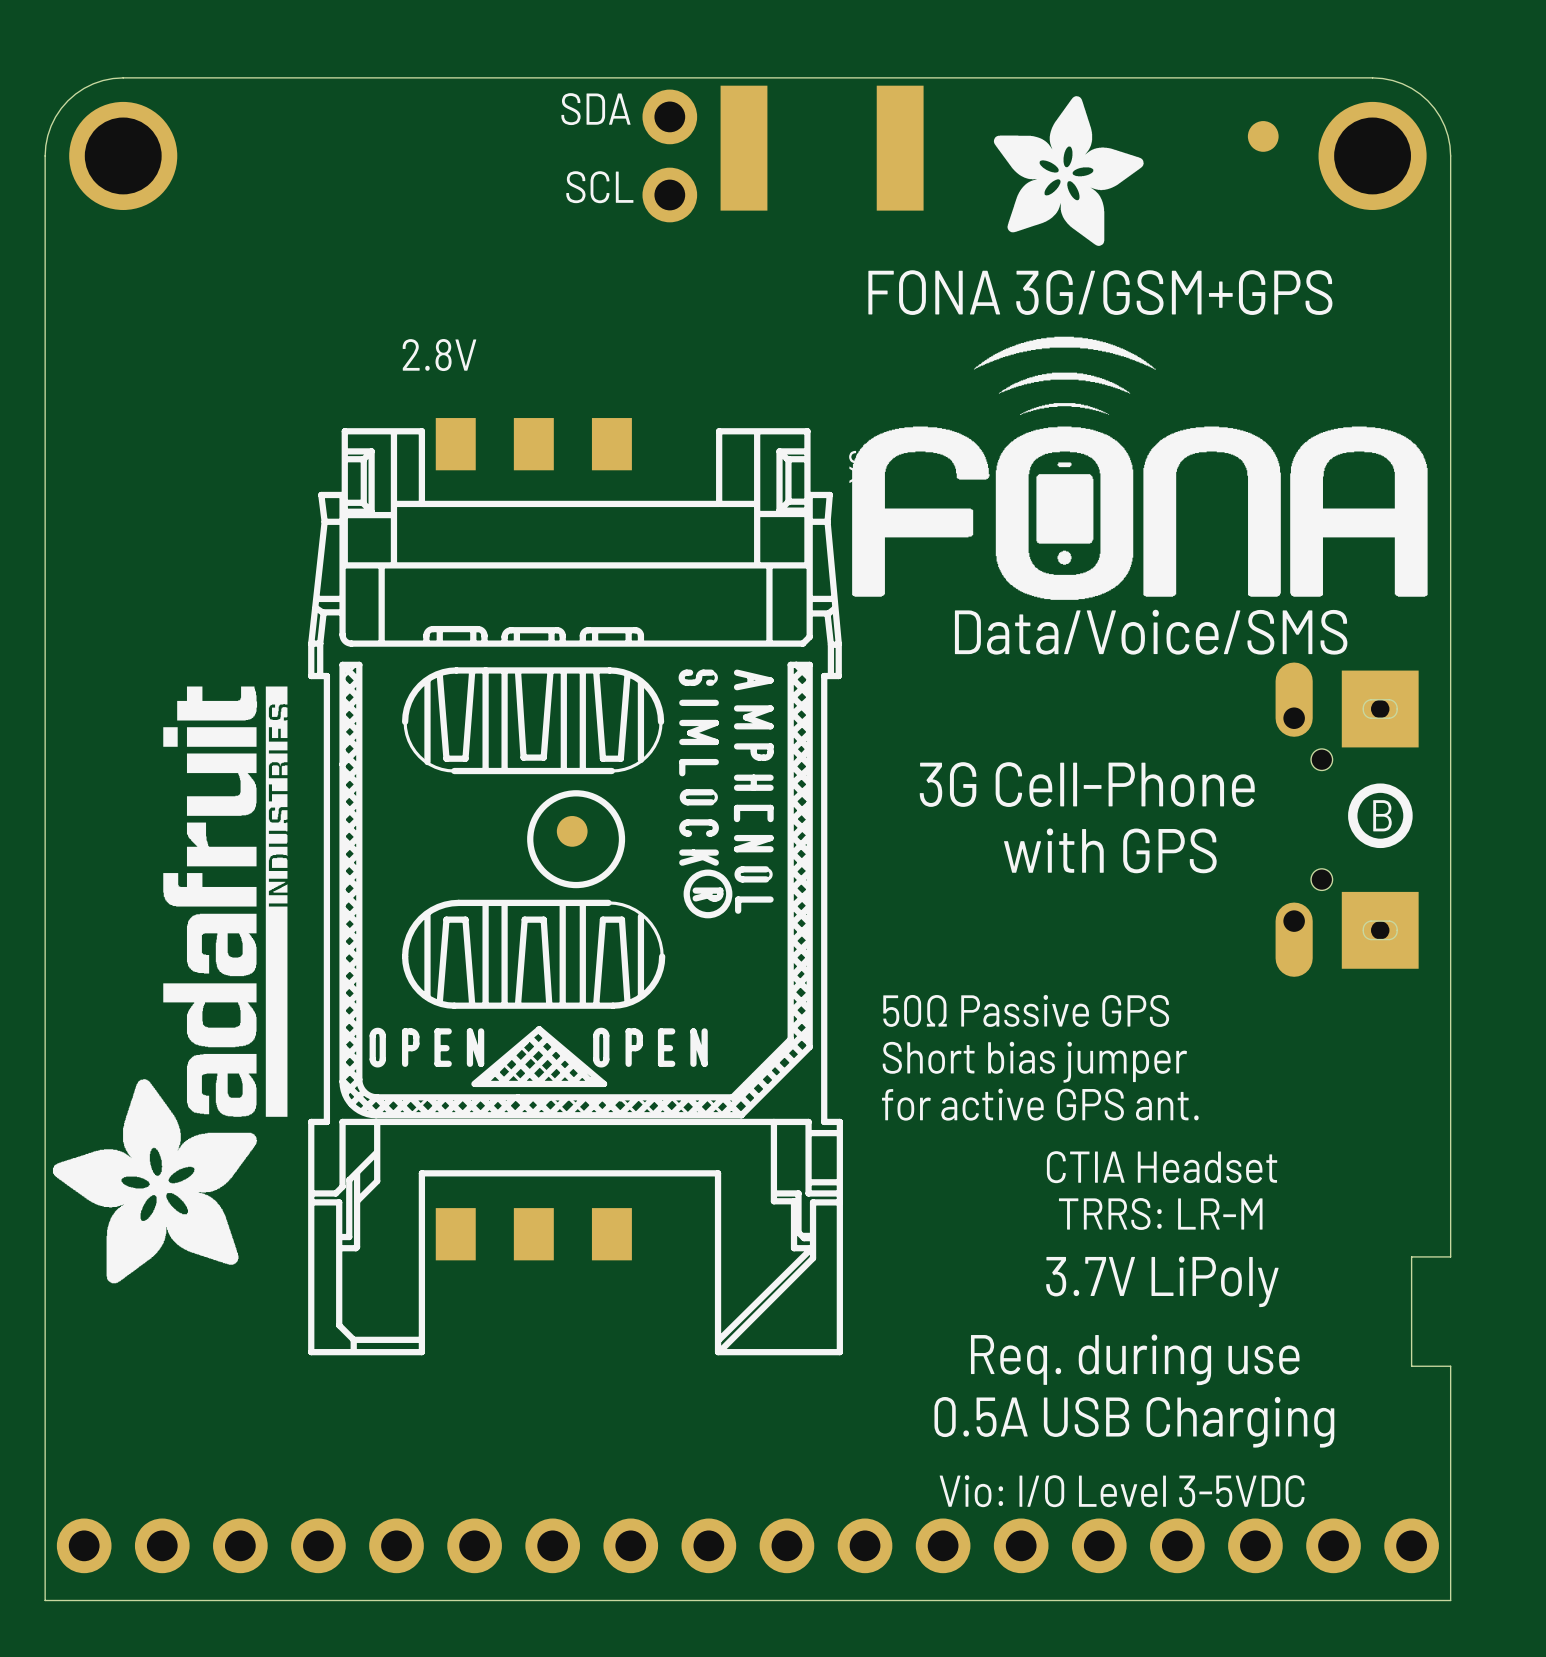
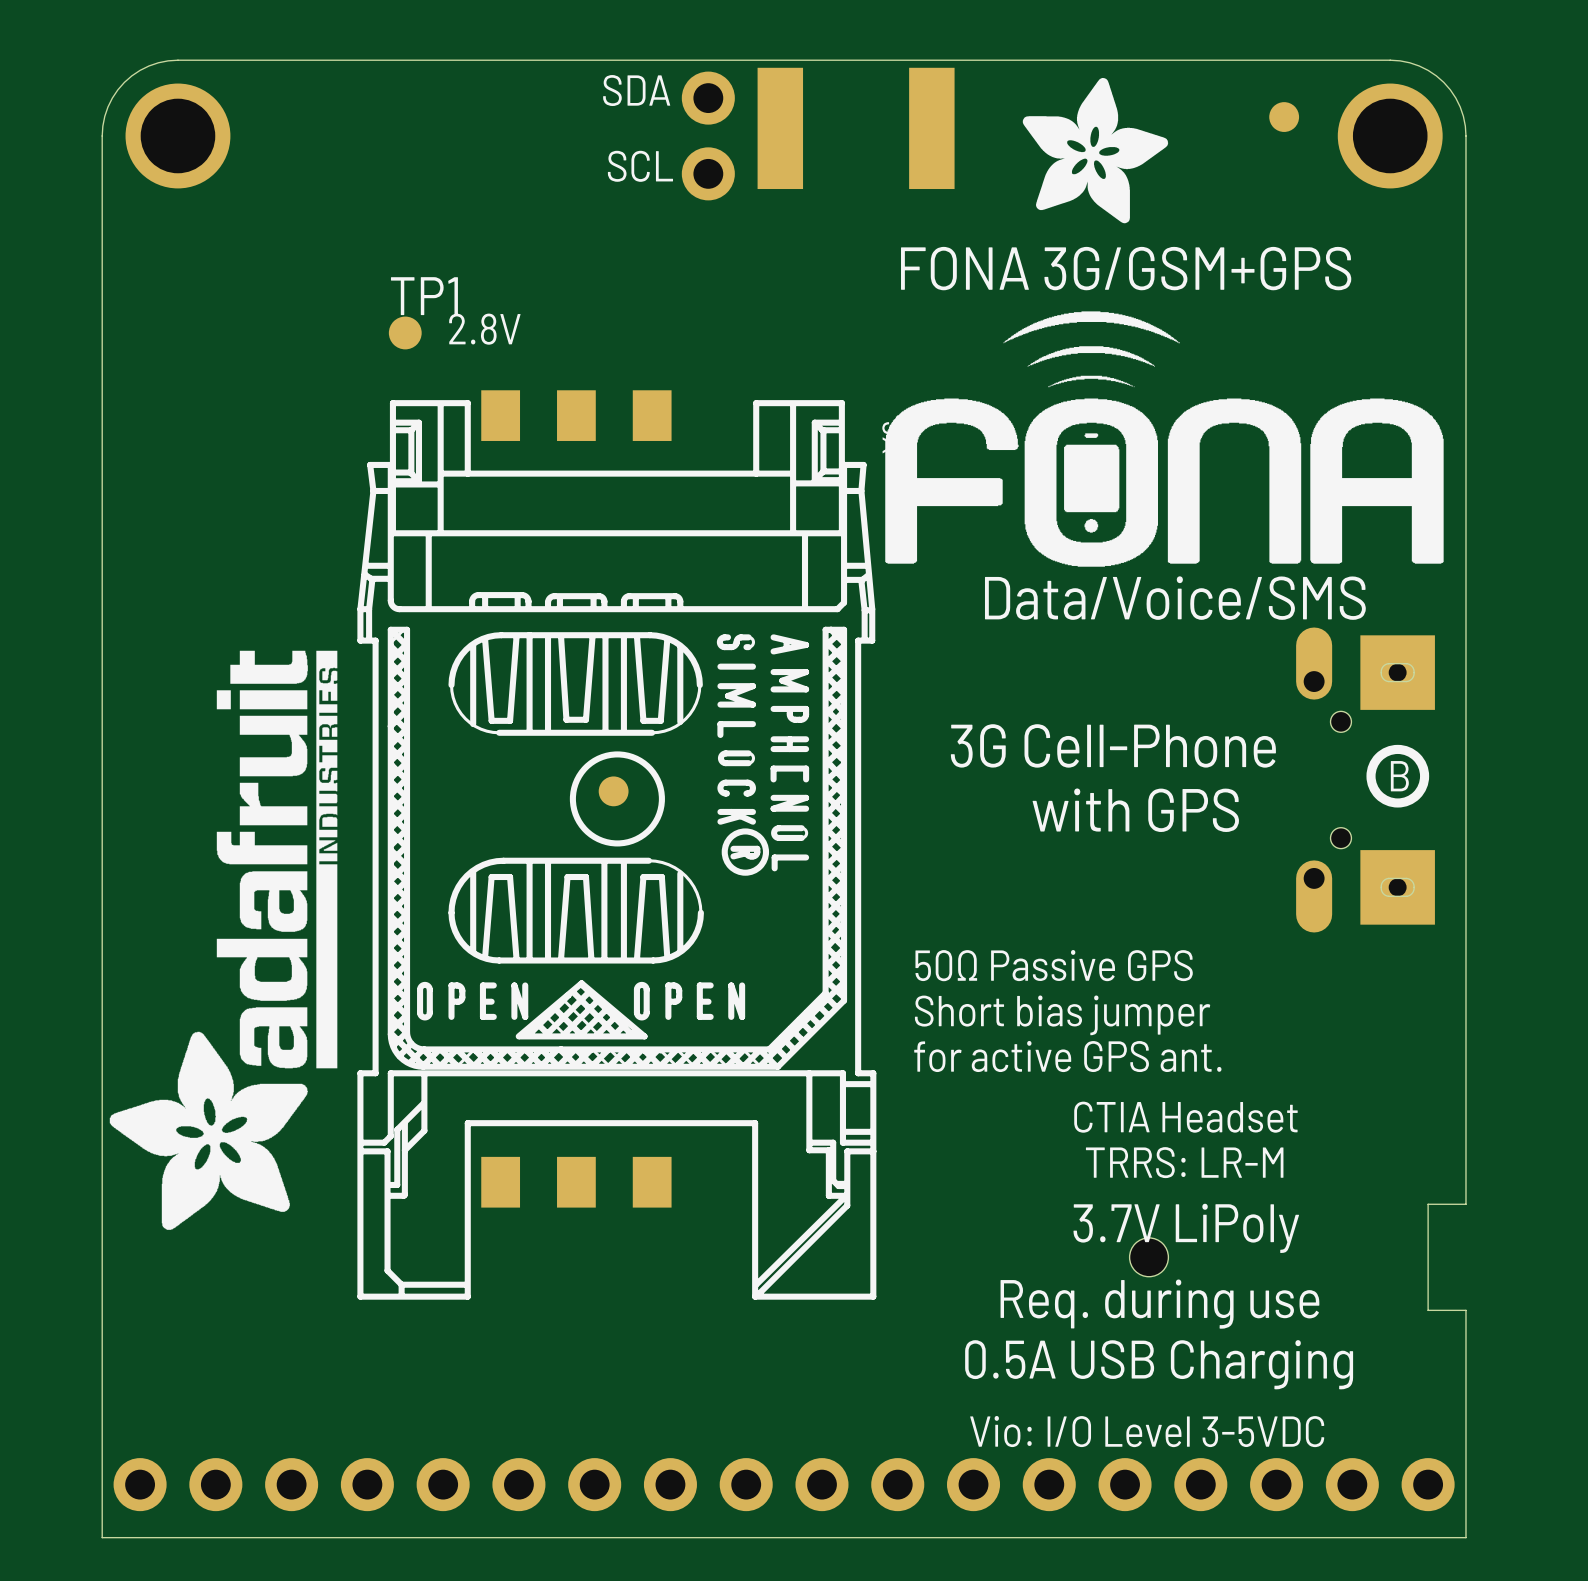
TP1: none -> (405, 332)
part: none -> (1149, 1257)

